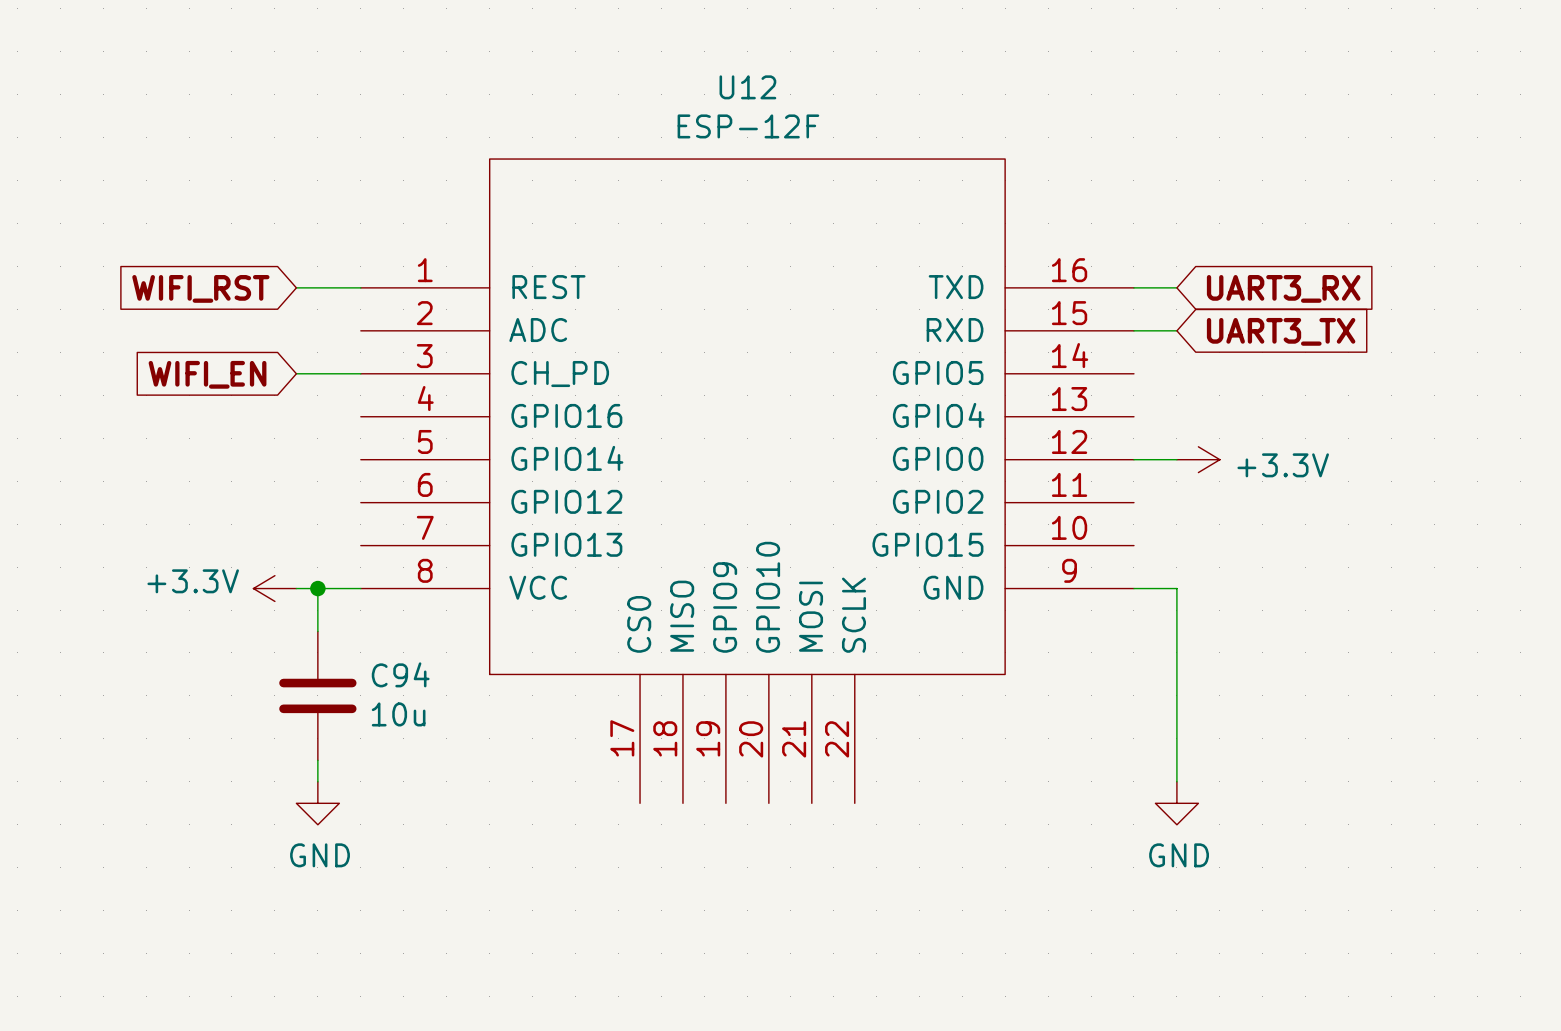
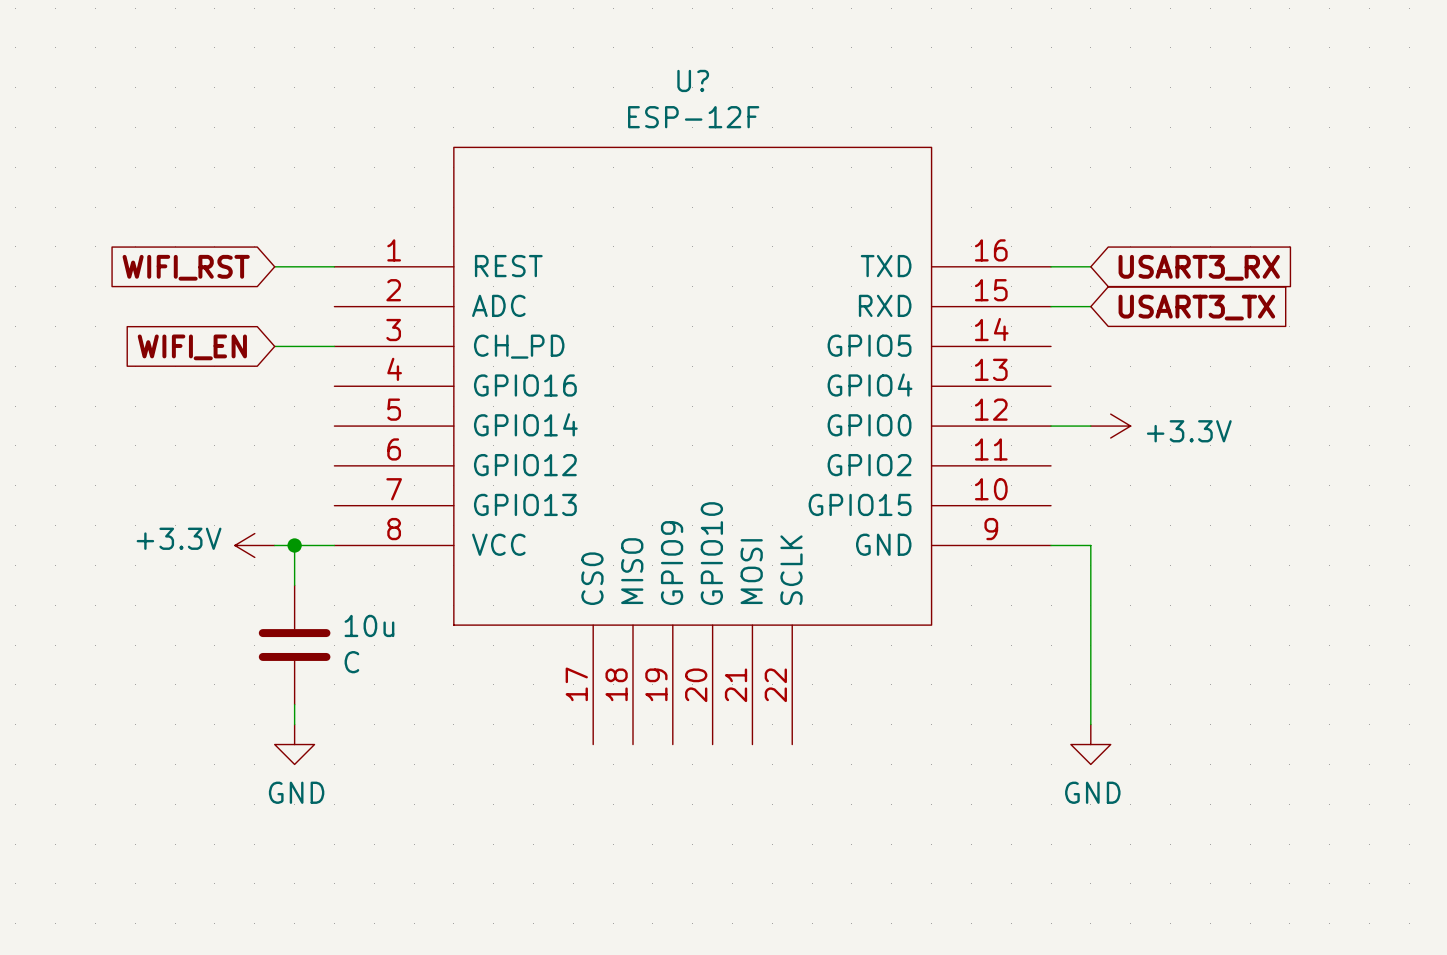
U12 name: U12 (747, 87) -> U? (693, 80)
global label: UART3_RX (1283, 288) -> USART3_RX (1199, 267)
global label: UART3_TX (1281, 331) -> USART3_TX (1196, 307)
C94 name: C94 (400, 674) -> 10u (369, 625)
C94 value: 10u (398, 714) -> C (351, 662)

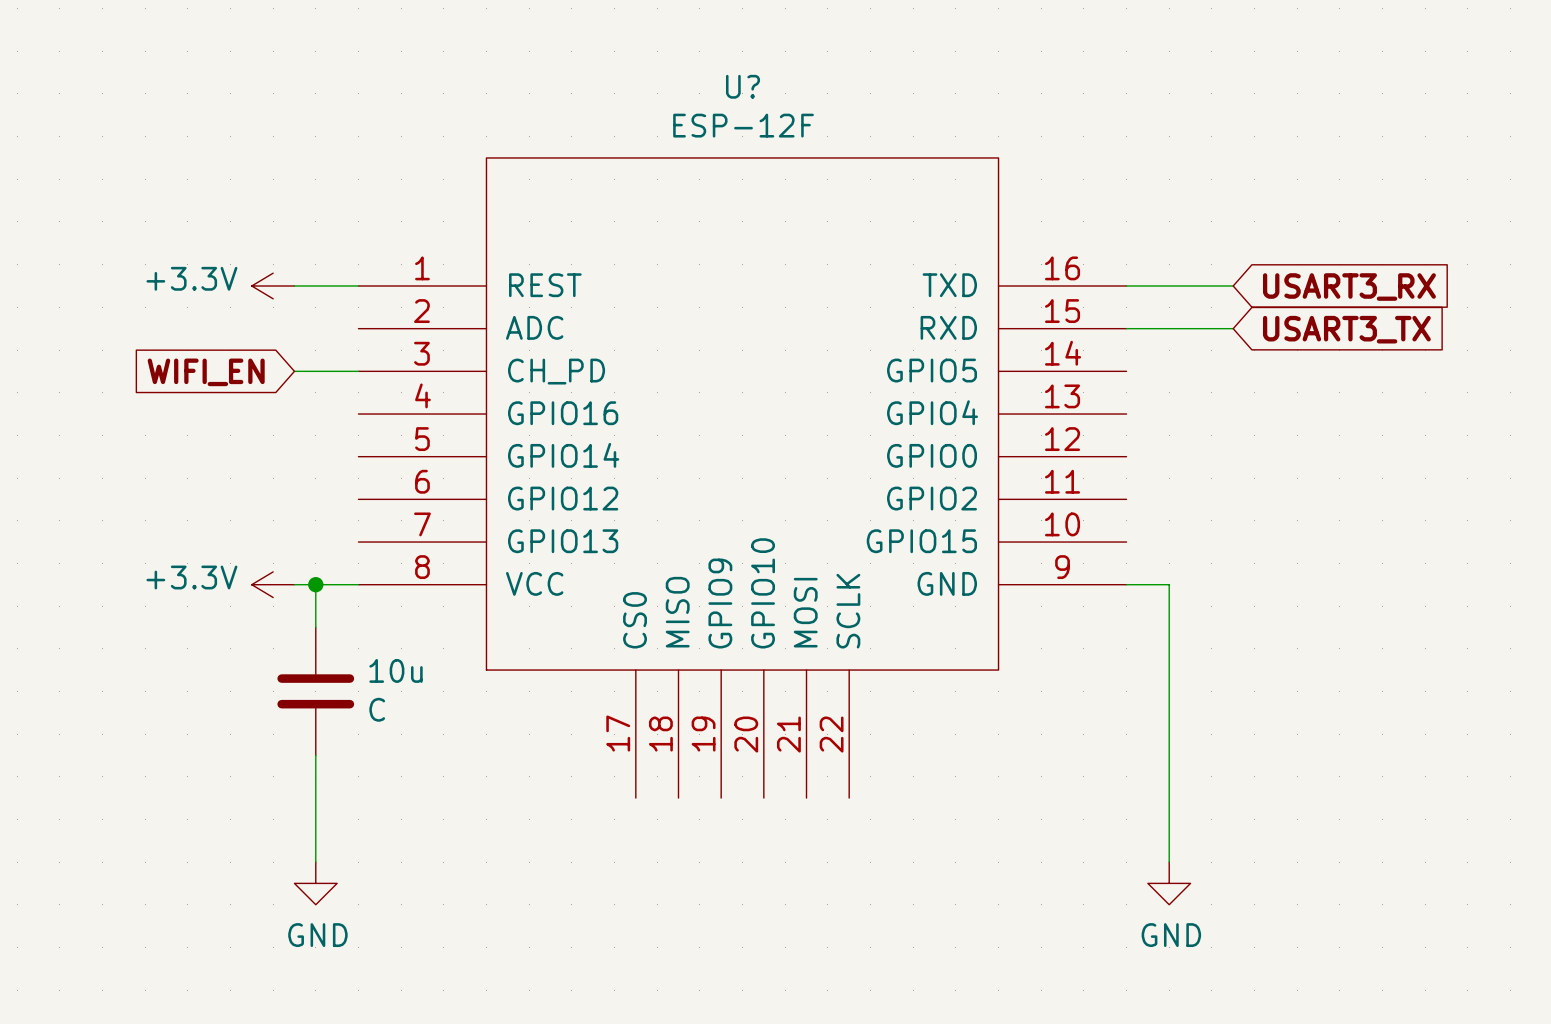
power symbol: none -> +3.3V (273, 285)
wire: none -> (1169, 285) (1233, 285)
global label: WIFI_RST (186, 267) -> none
global label position: USART3_RX (1199, 267) -> USART3_RX (1349, 287)
wire: none -> (1169, 328) (1233, 328)
global label position: USART3_TX (1196, 307) -> USART3_TX (1346, 329)
wire: (1051, 426) (1090, 426) -> none
power symbol: +3.3V (1110, 426) -> none
wire: none -> (315, 776) (315, 862)
wire: none -> (1169, 776) (1169, 862)
power symbol position: GND (294, 744) -> GND (315, 883)
power symbol position: GND (1090, 744) -> GND (1169, 883)

